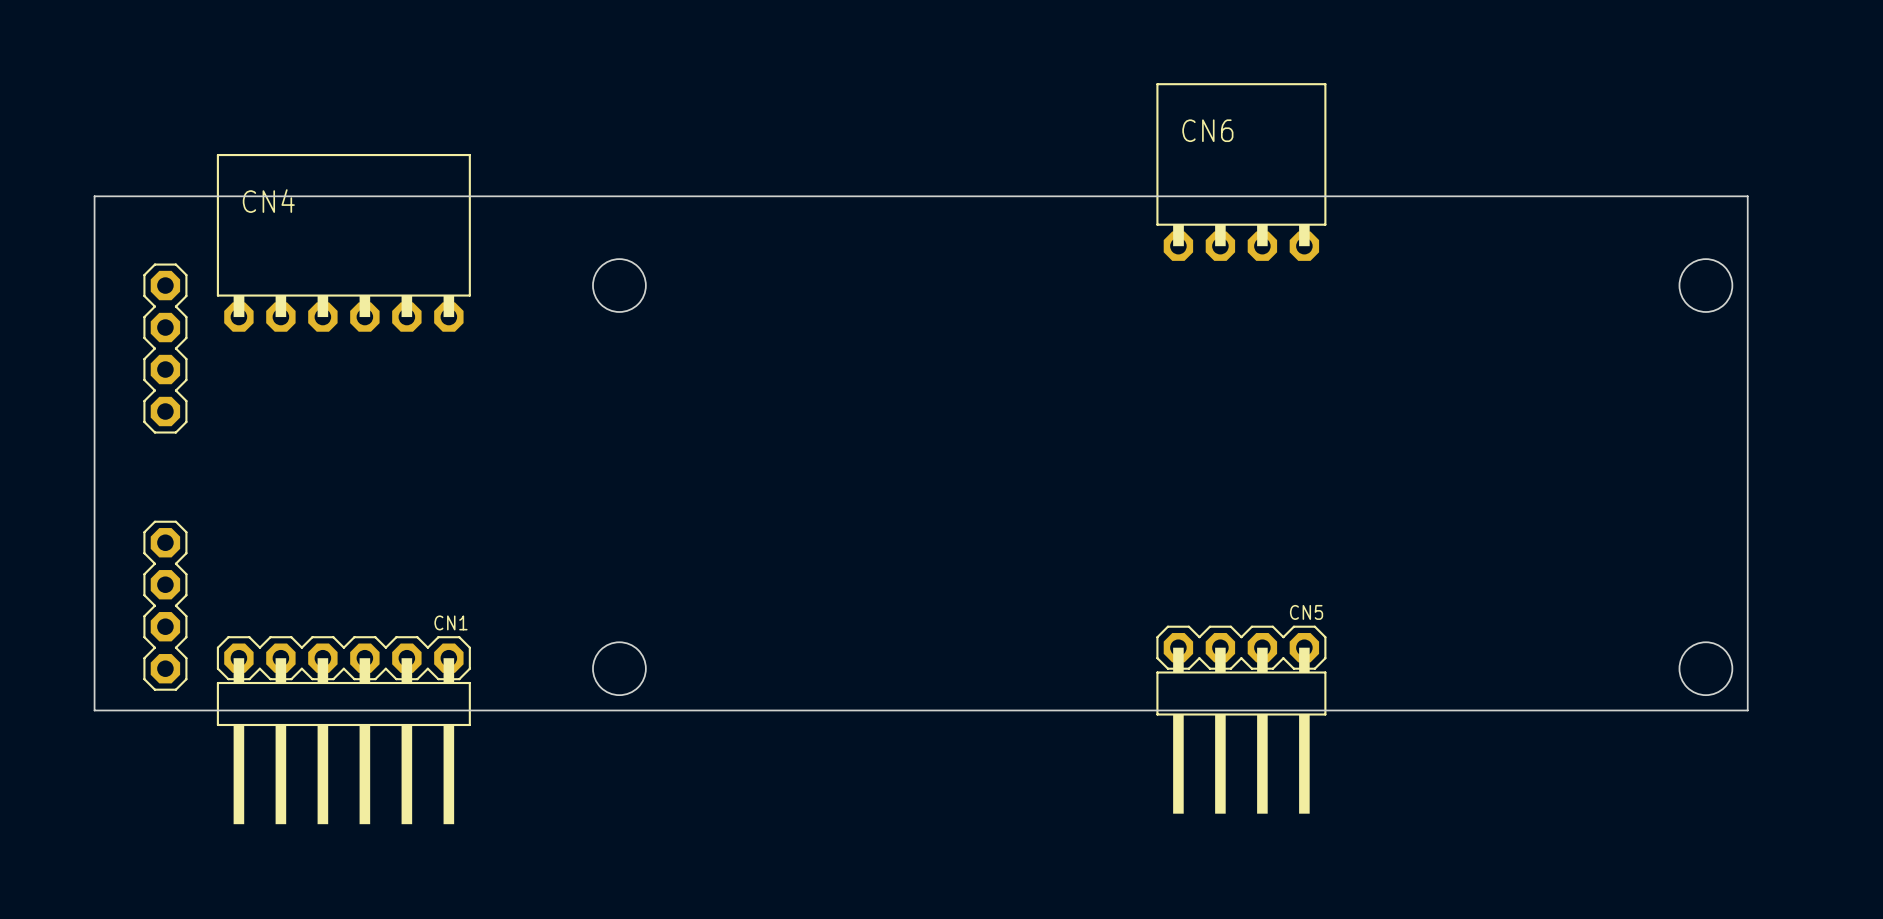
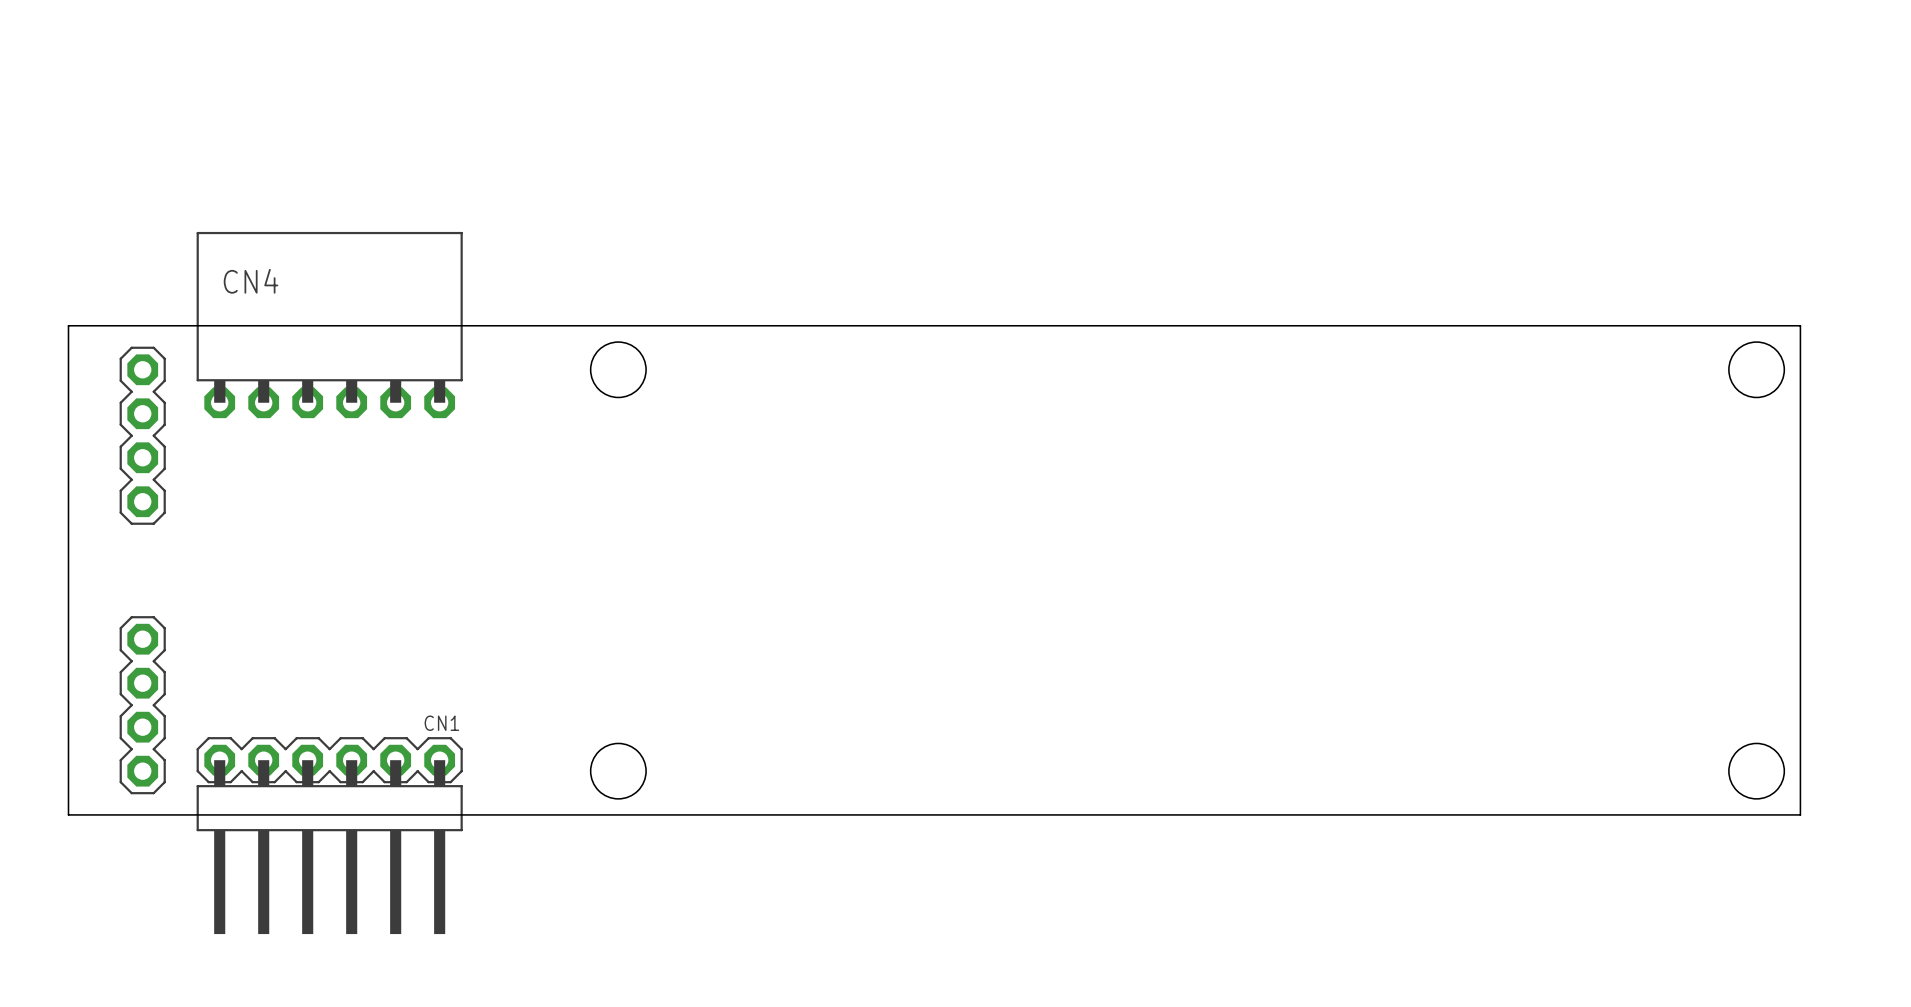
CN6: (1241, 172) -> none
board edge: (94, 243) (94, 196) (1747, 196) (1747, 243) -> (68, 325) (1800, 325)
CN5: (1241, 719) -> none

